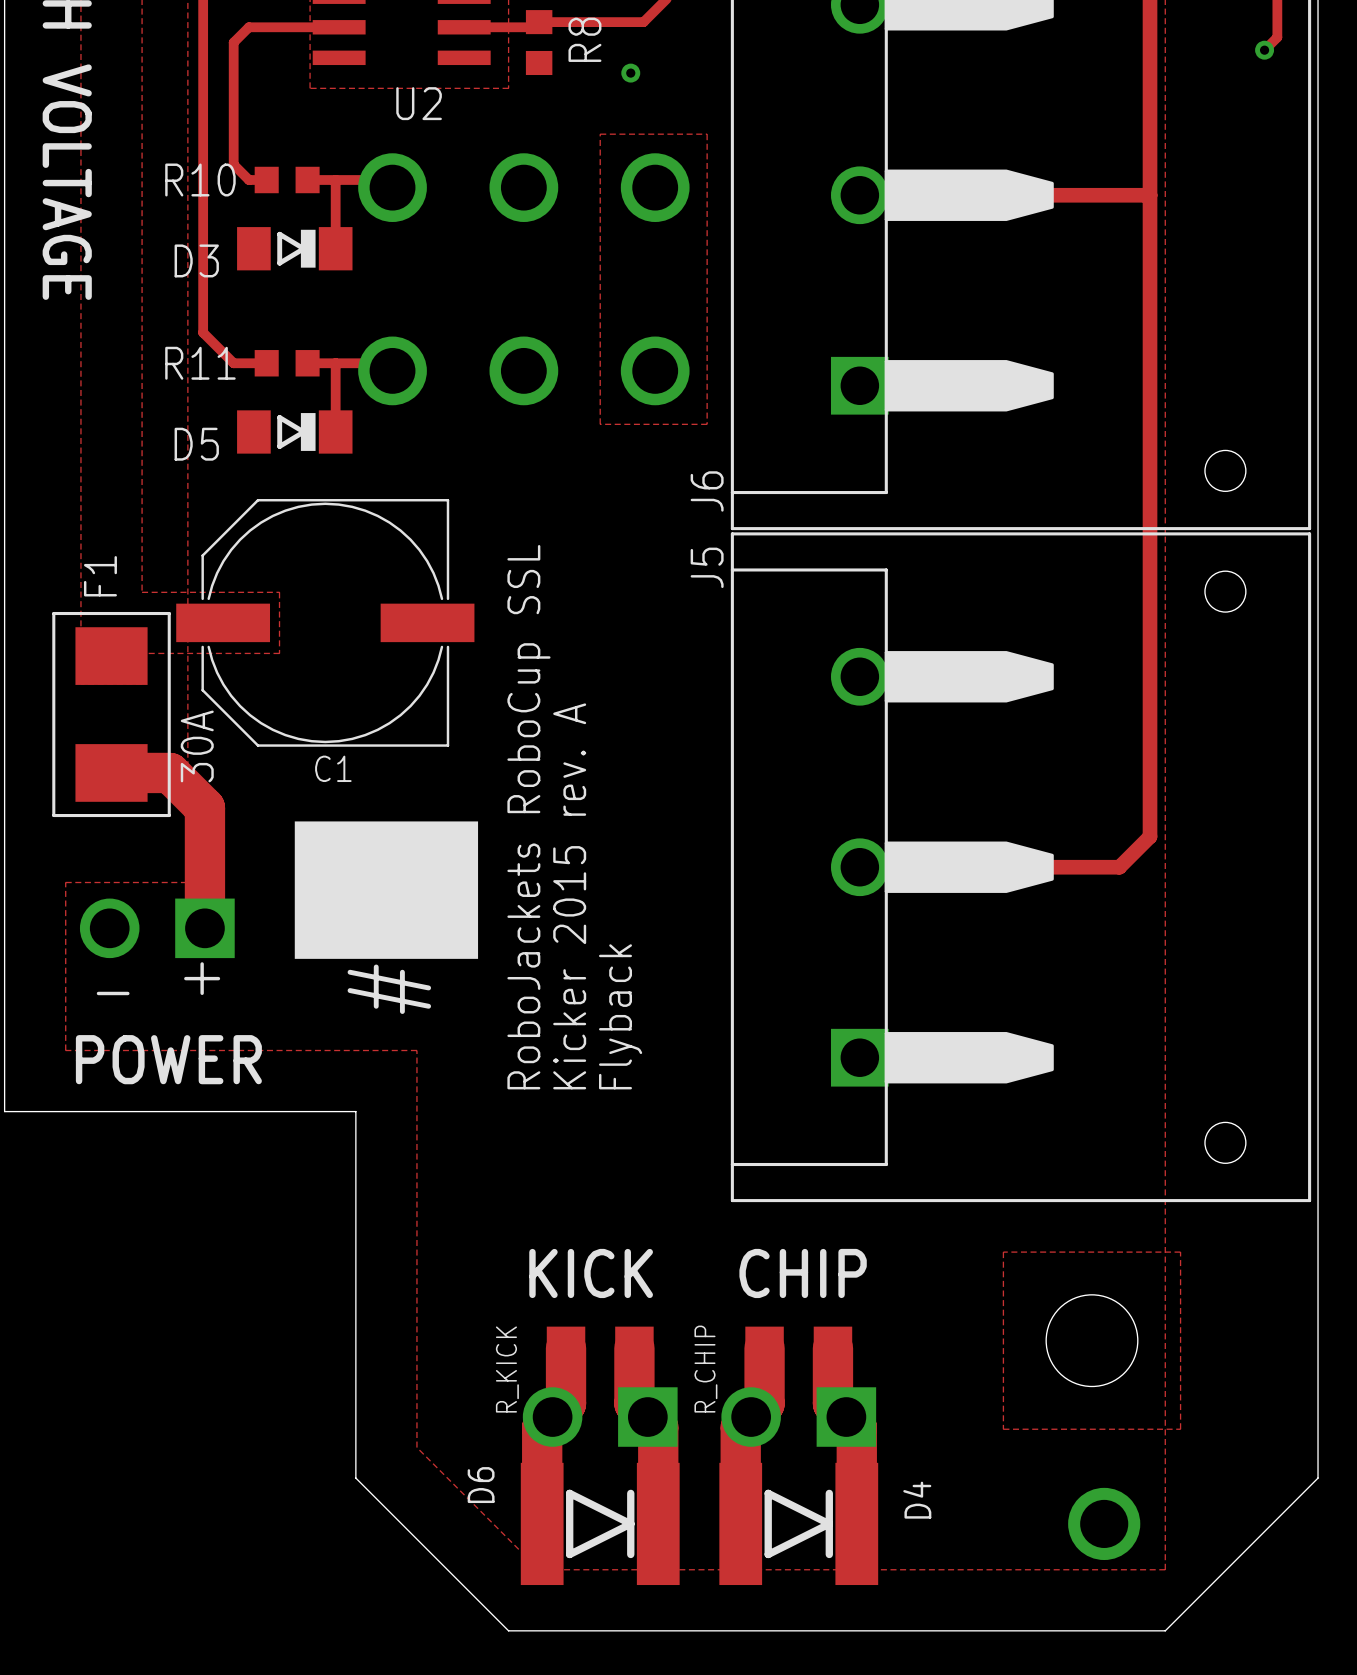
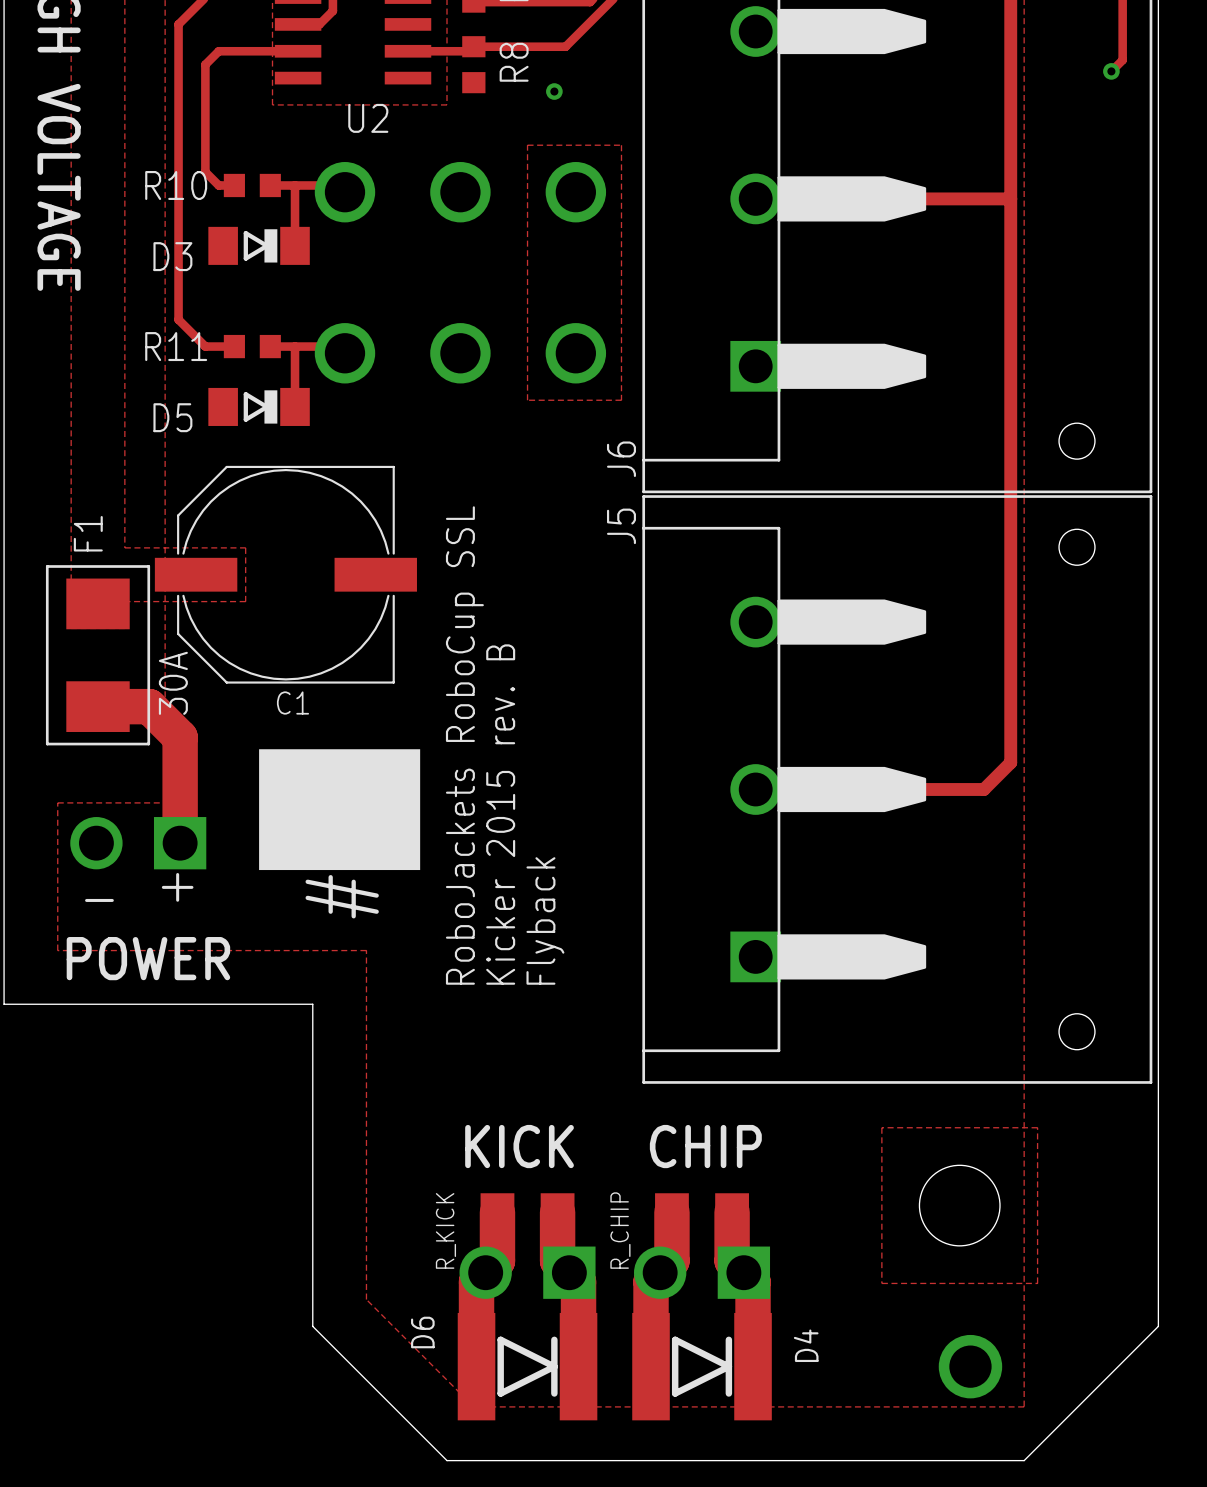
text: Kicker 2015 rev. A (569, 896) -> Kicker 2015 rev. B (500, 814)

